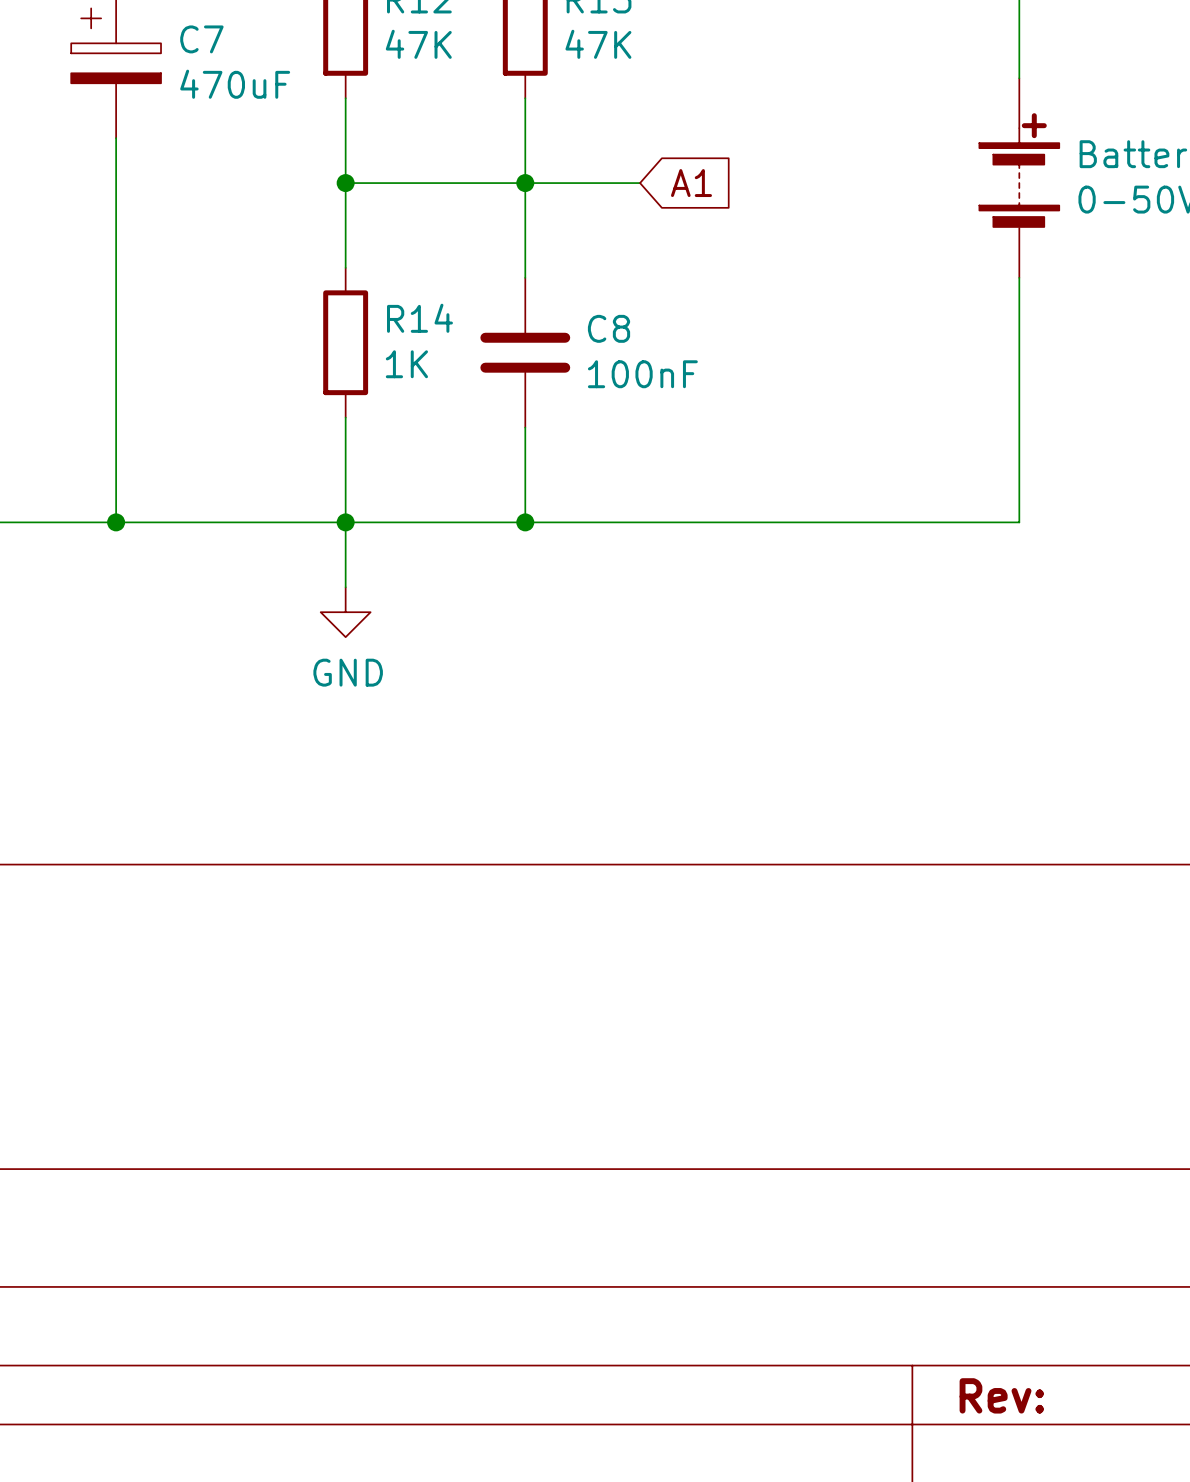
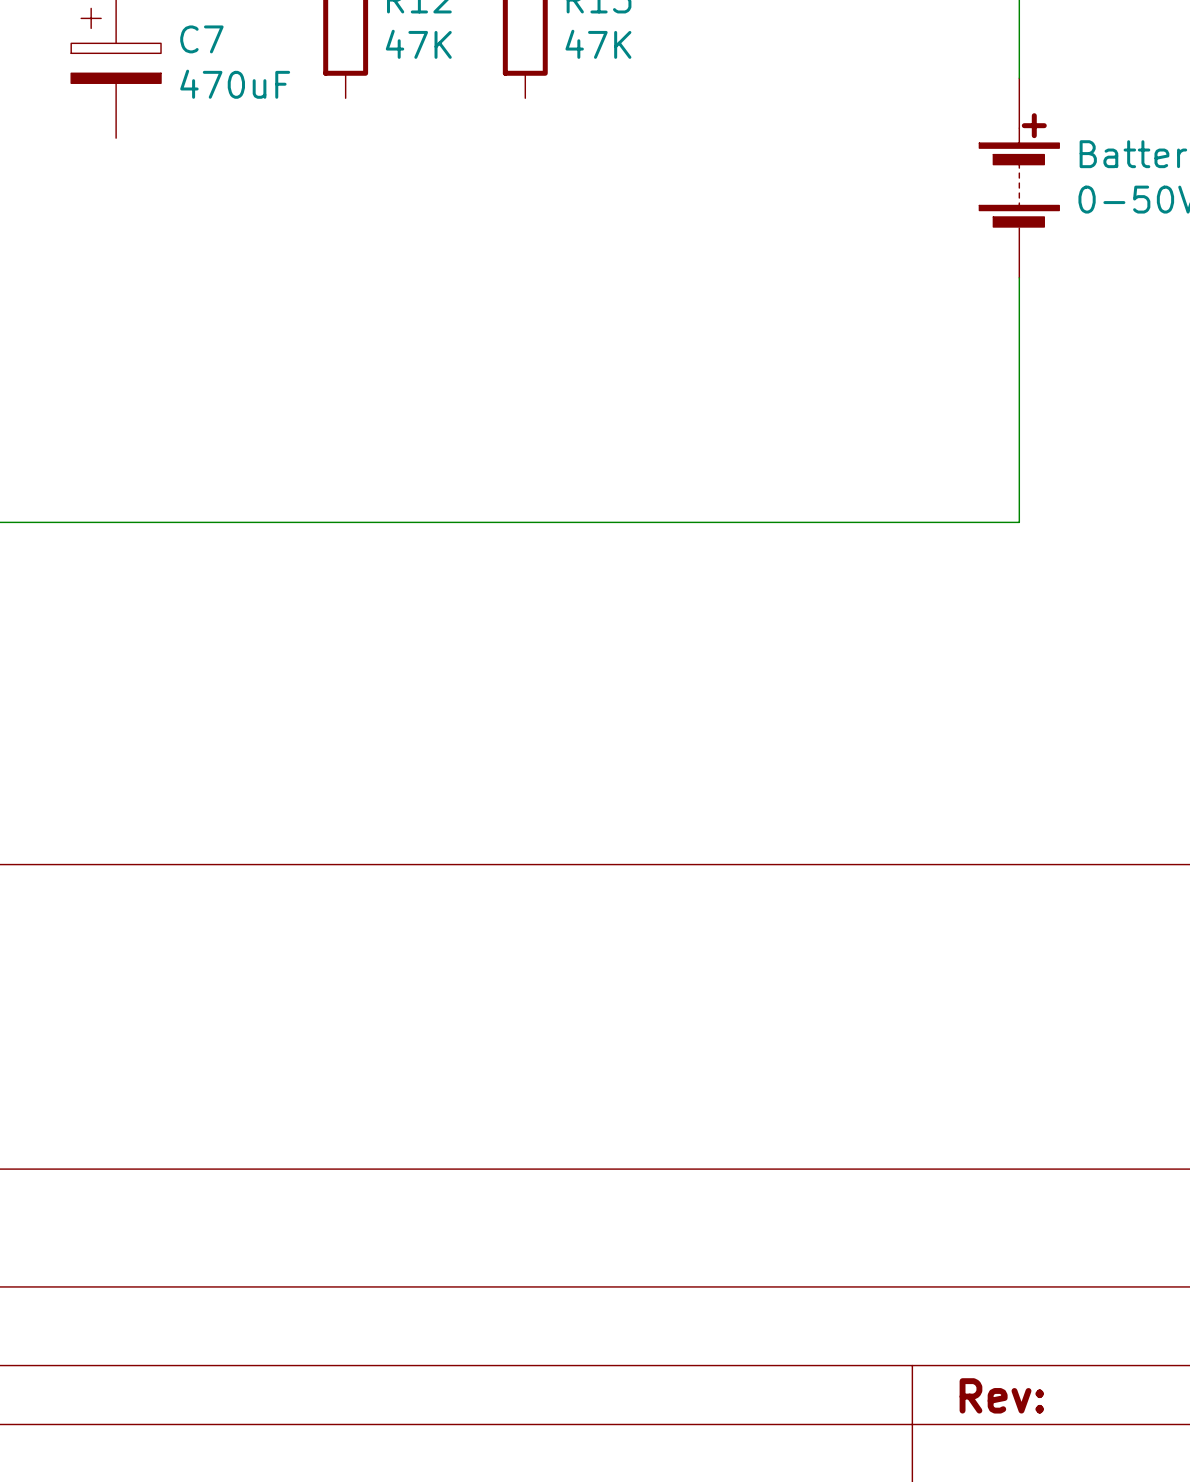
wire: (345, 98) (345, 267) -> none
wire: (525, 98) (525, 277) -> none
wire: (116, 138) (116, 522) -> none
wire: (345, 183) (640, 183) -> none
junction: (345, 183) -> none
junction: (525, 183) -> none
global label: A1 (691, 183) -> none
R14: 1K (345, 342) -> none
C8: 100nF (525, 352) -> none
wire: (345, 417) (345, 587) -> none
wire: (525, 427) (525, 522) -> none
junction: (116, 522) -> none
junction: (345, 522) -> none
junction: (525, 522) -> none
power symbol: GND (345, 612) -> none

